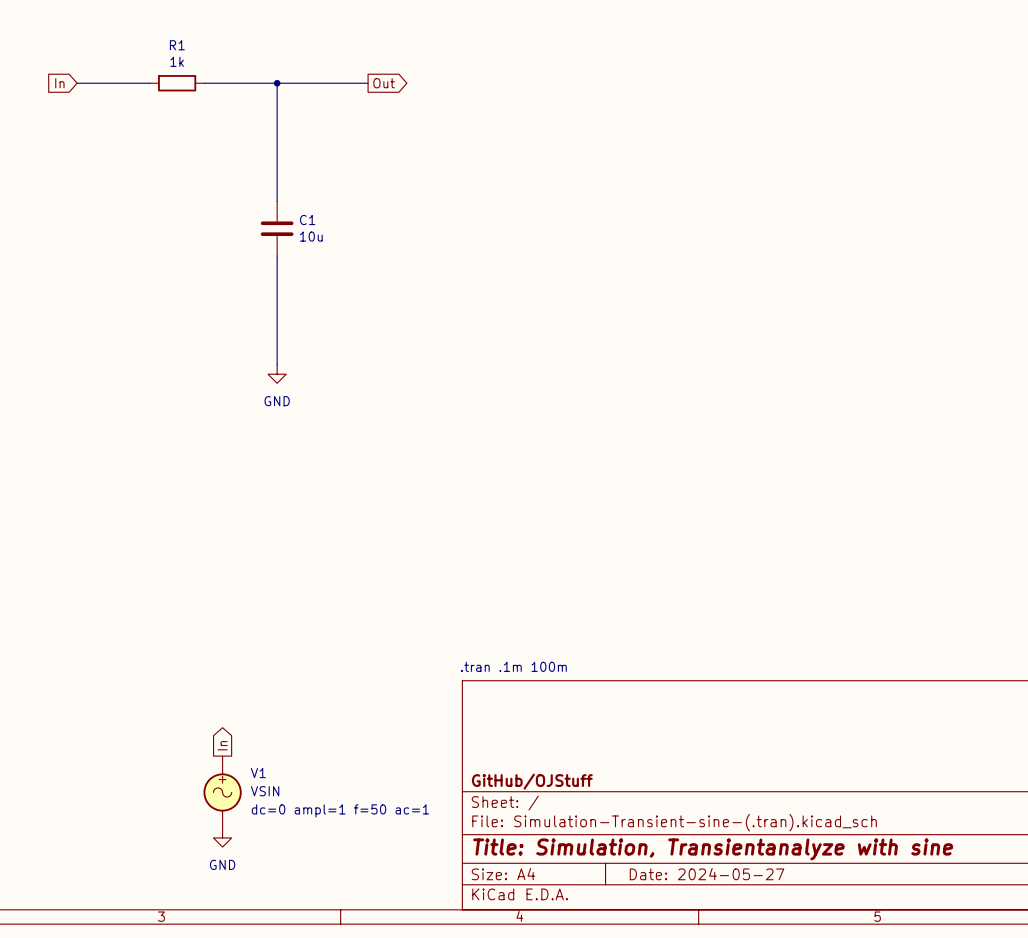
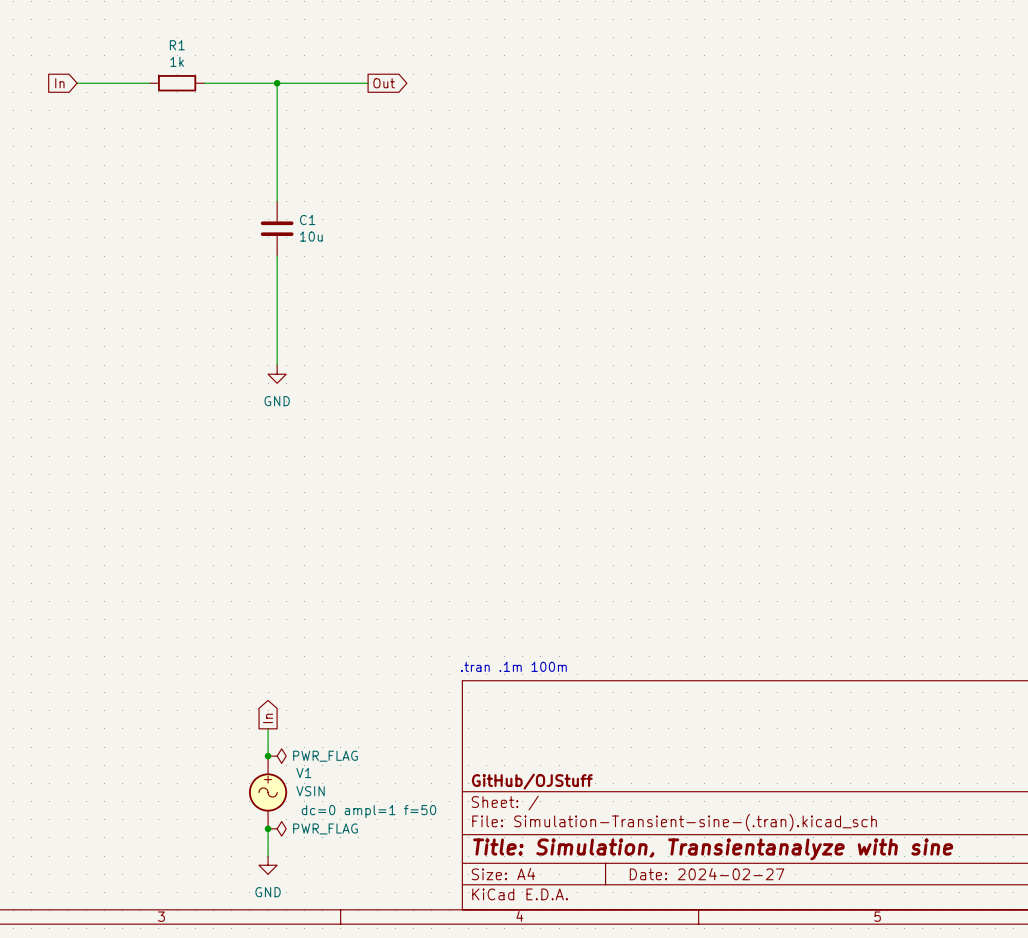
wire: none -> (268, 728) (268, 756)
global label position: In (222, 745) -> In (268, 718)
junction: none -> (268, 756)
power symbol: none -> PWR_FLAG (277, 756)
V1 position: (222, 792) -> (268, 792)
V1 text: dc=0 ampl=1 f=50 ac=1 (340, 810) -> dc=0 ampl=1 f=50 (369, 811)
wire: none -> (268, 828) (268, 856)
junction: none -> (268, 828)
power symbol: none -> PWR_FLAG (277, 828)
power symbol position: GND (222, 837) -> GND (268, 865)
title block: Date: 2024-05-27 (707, 874) -> Date: 2024-02-27 (707, 874)

